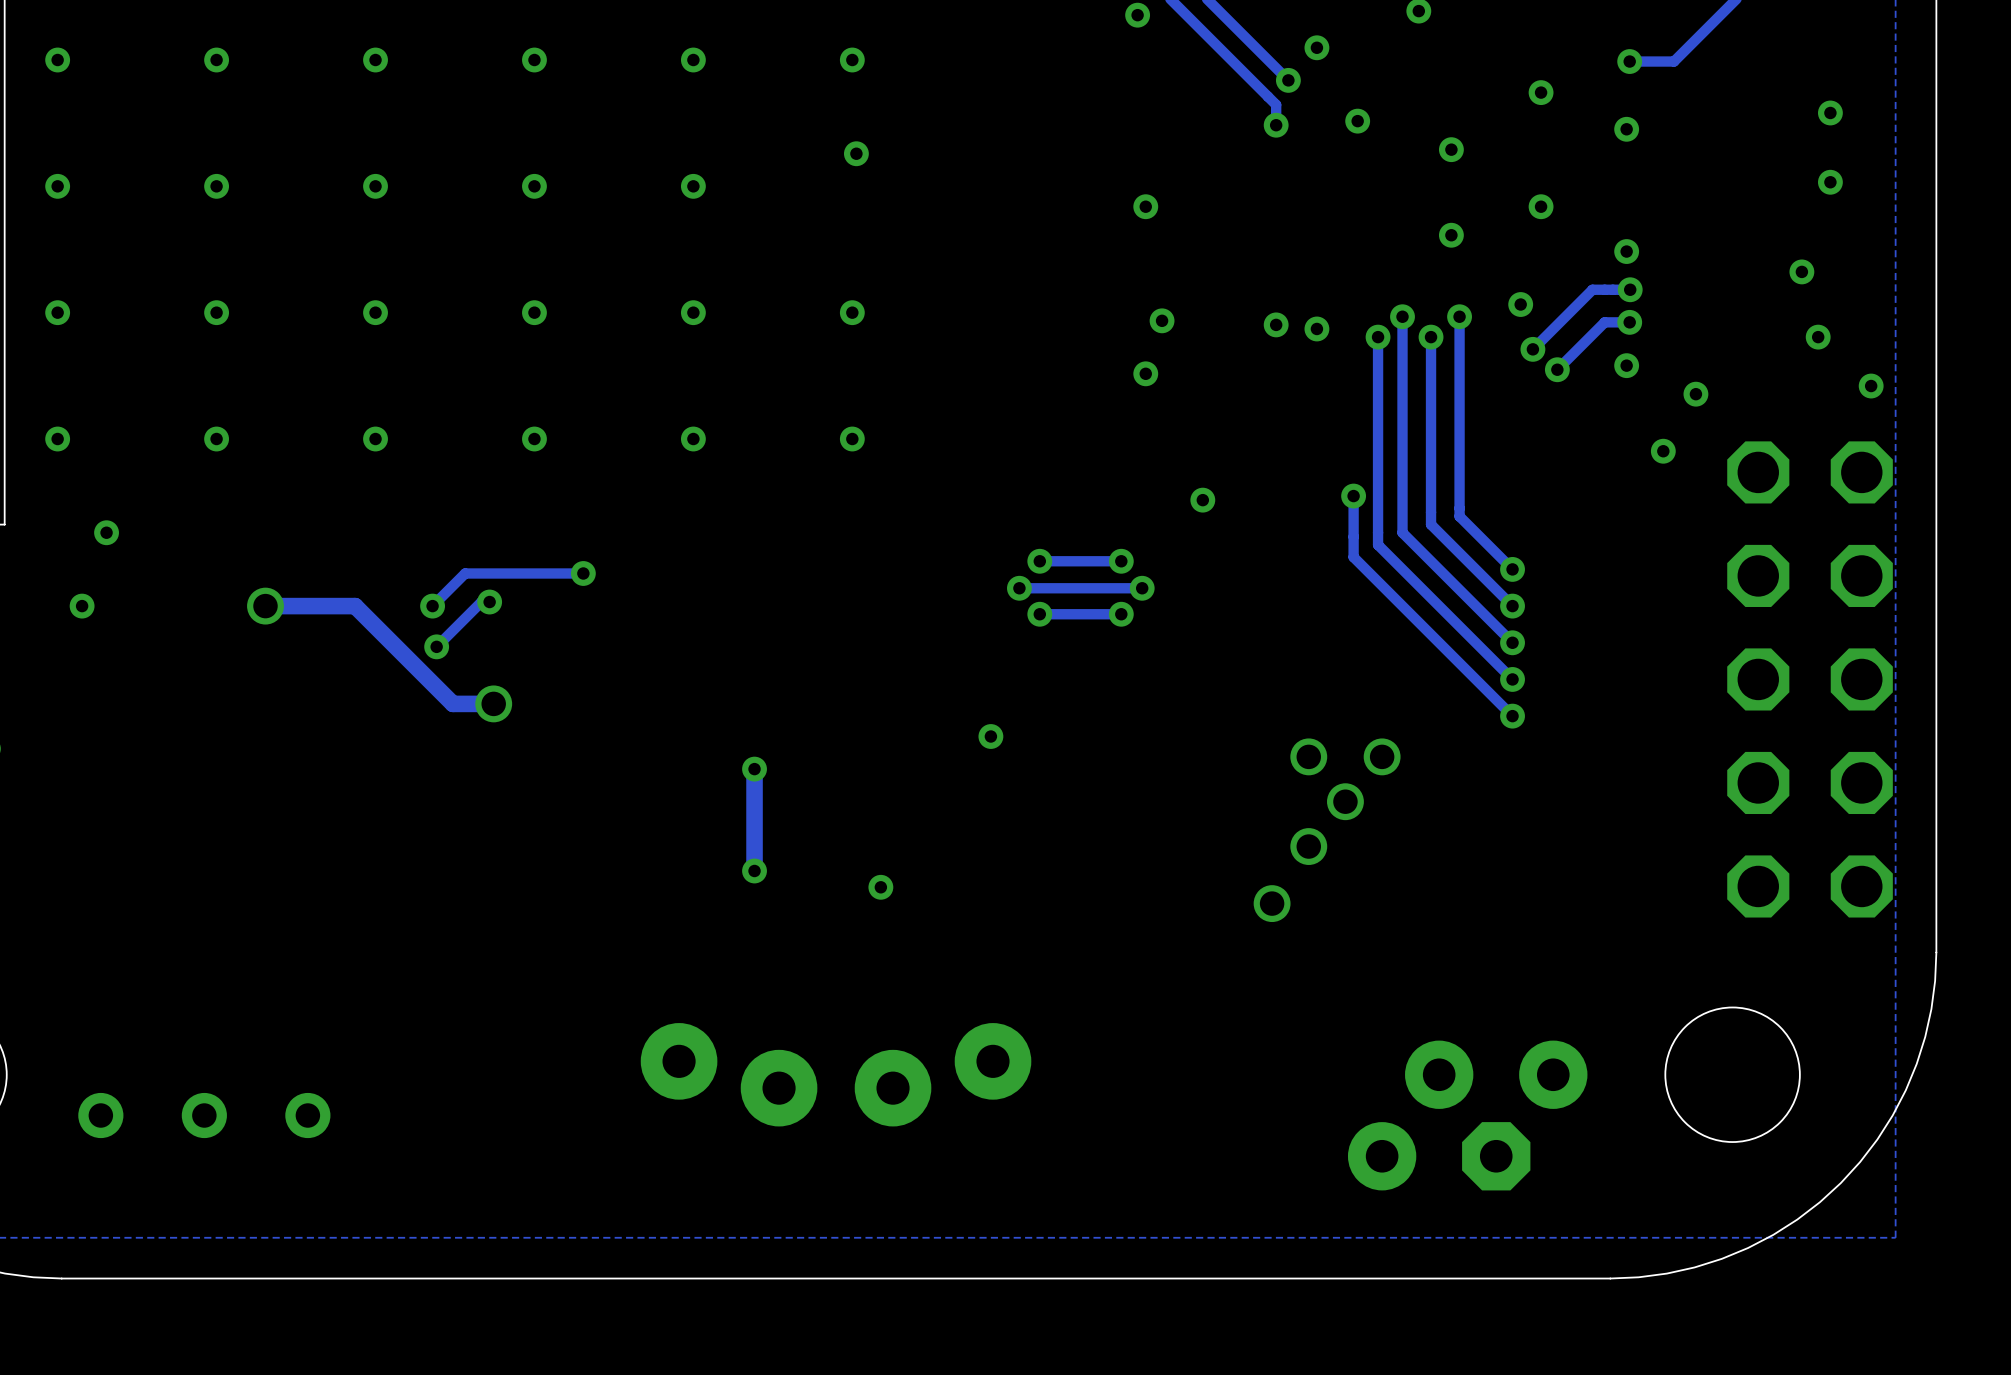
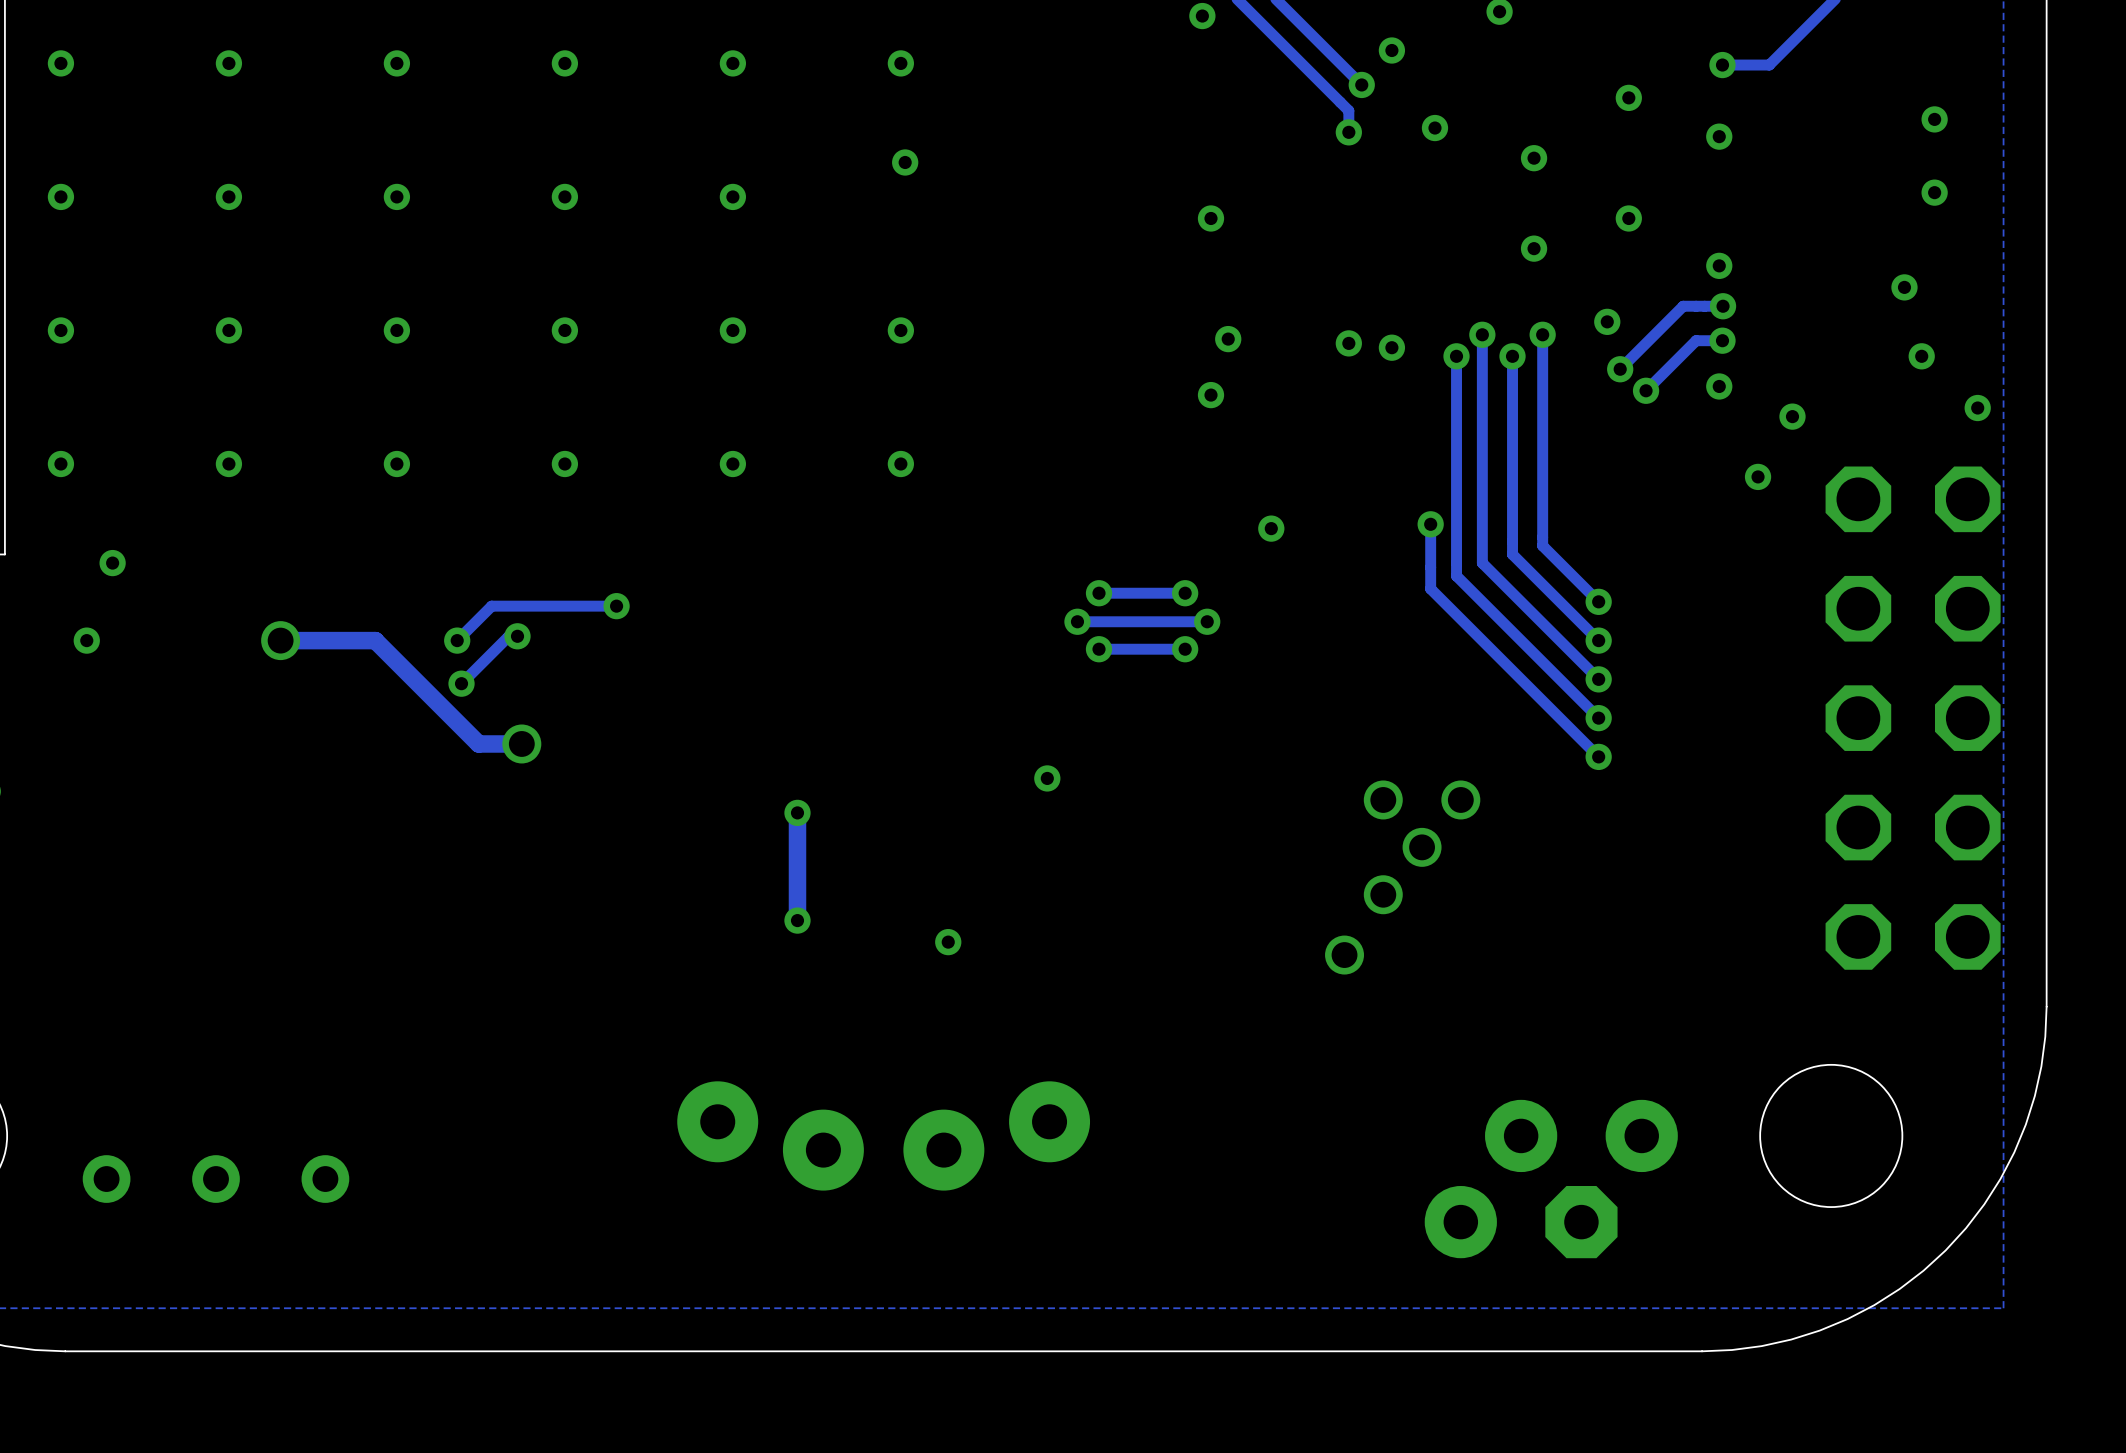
via position: (880, 887) -> (948, 942)

